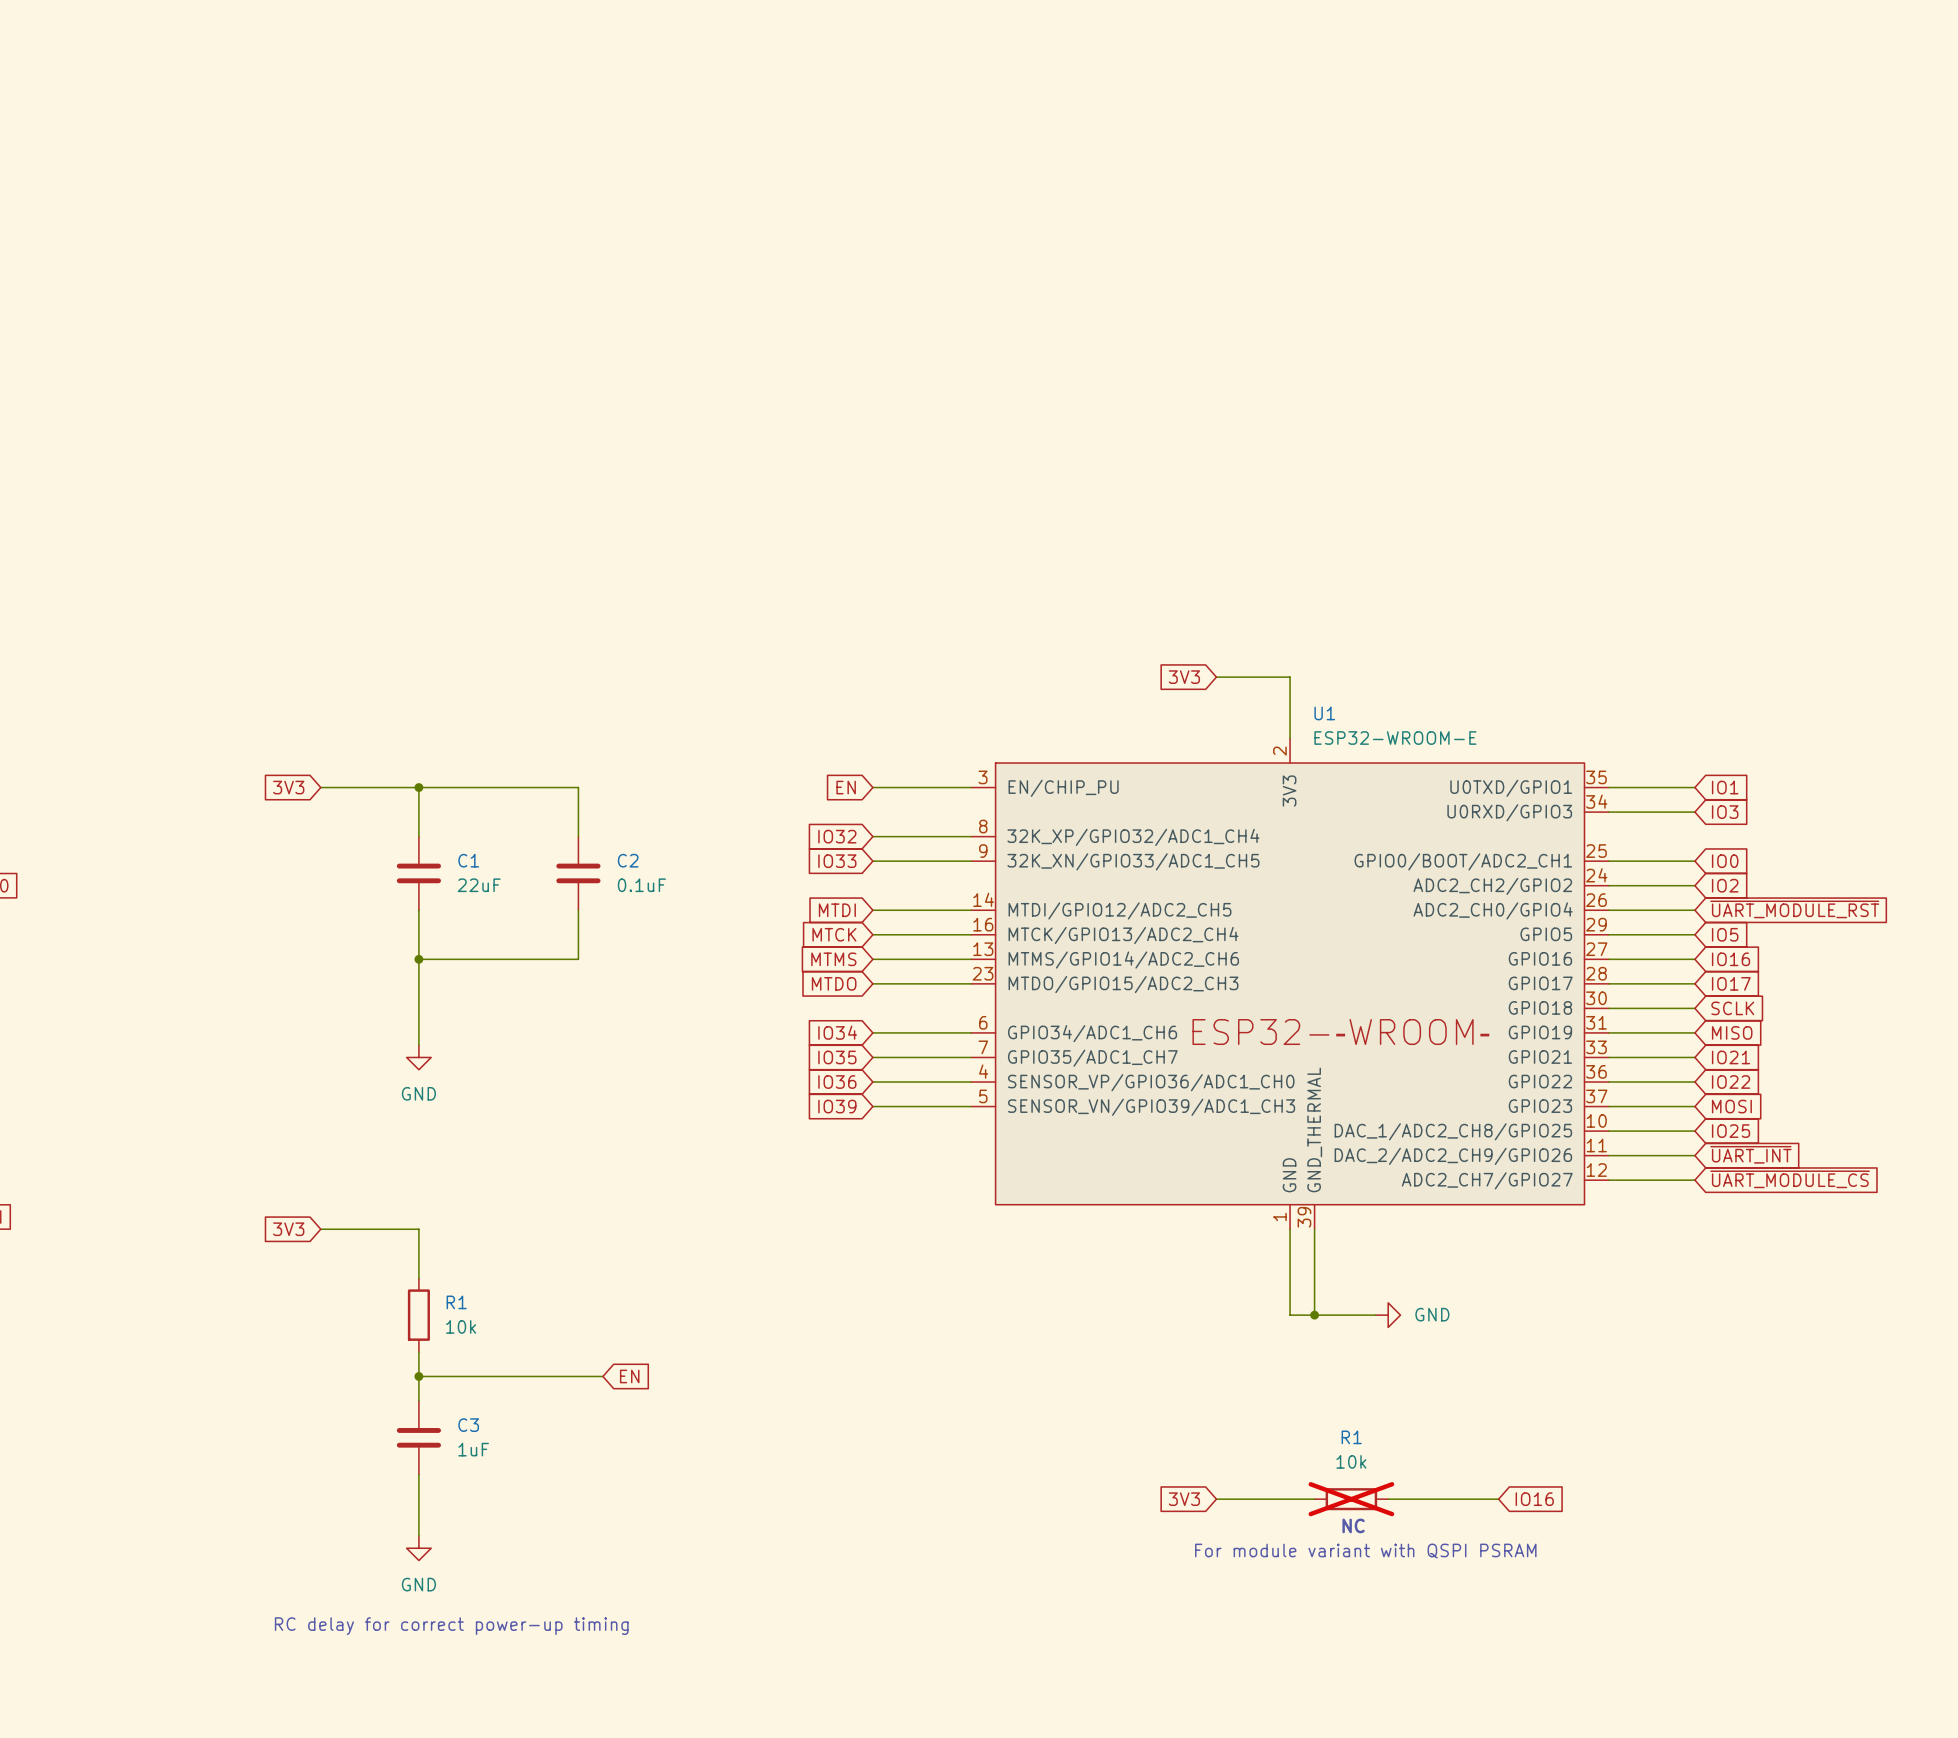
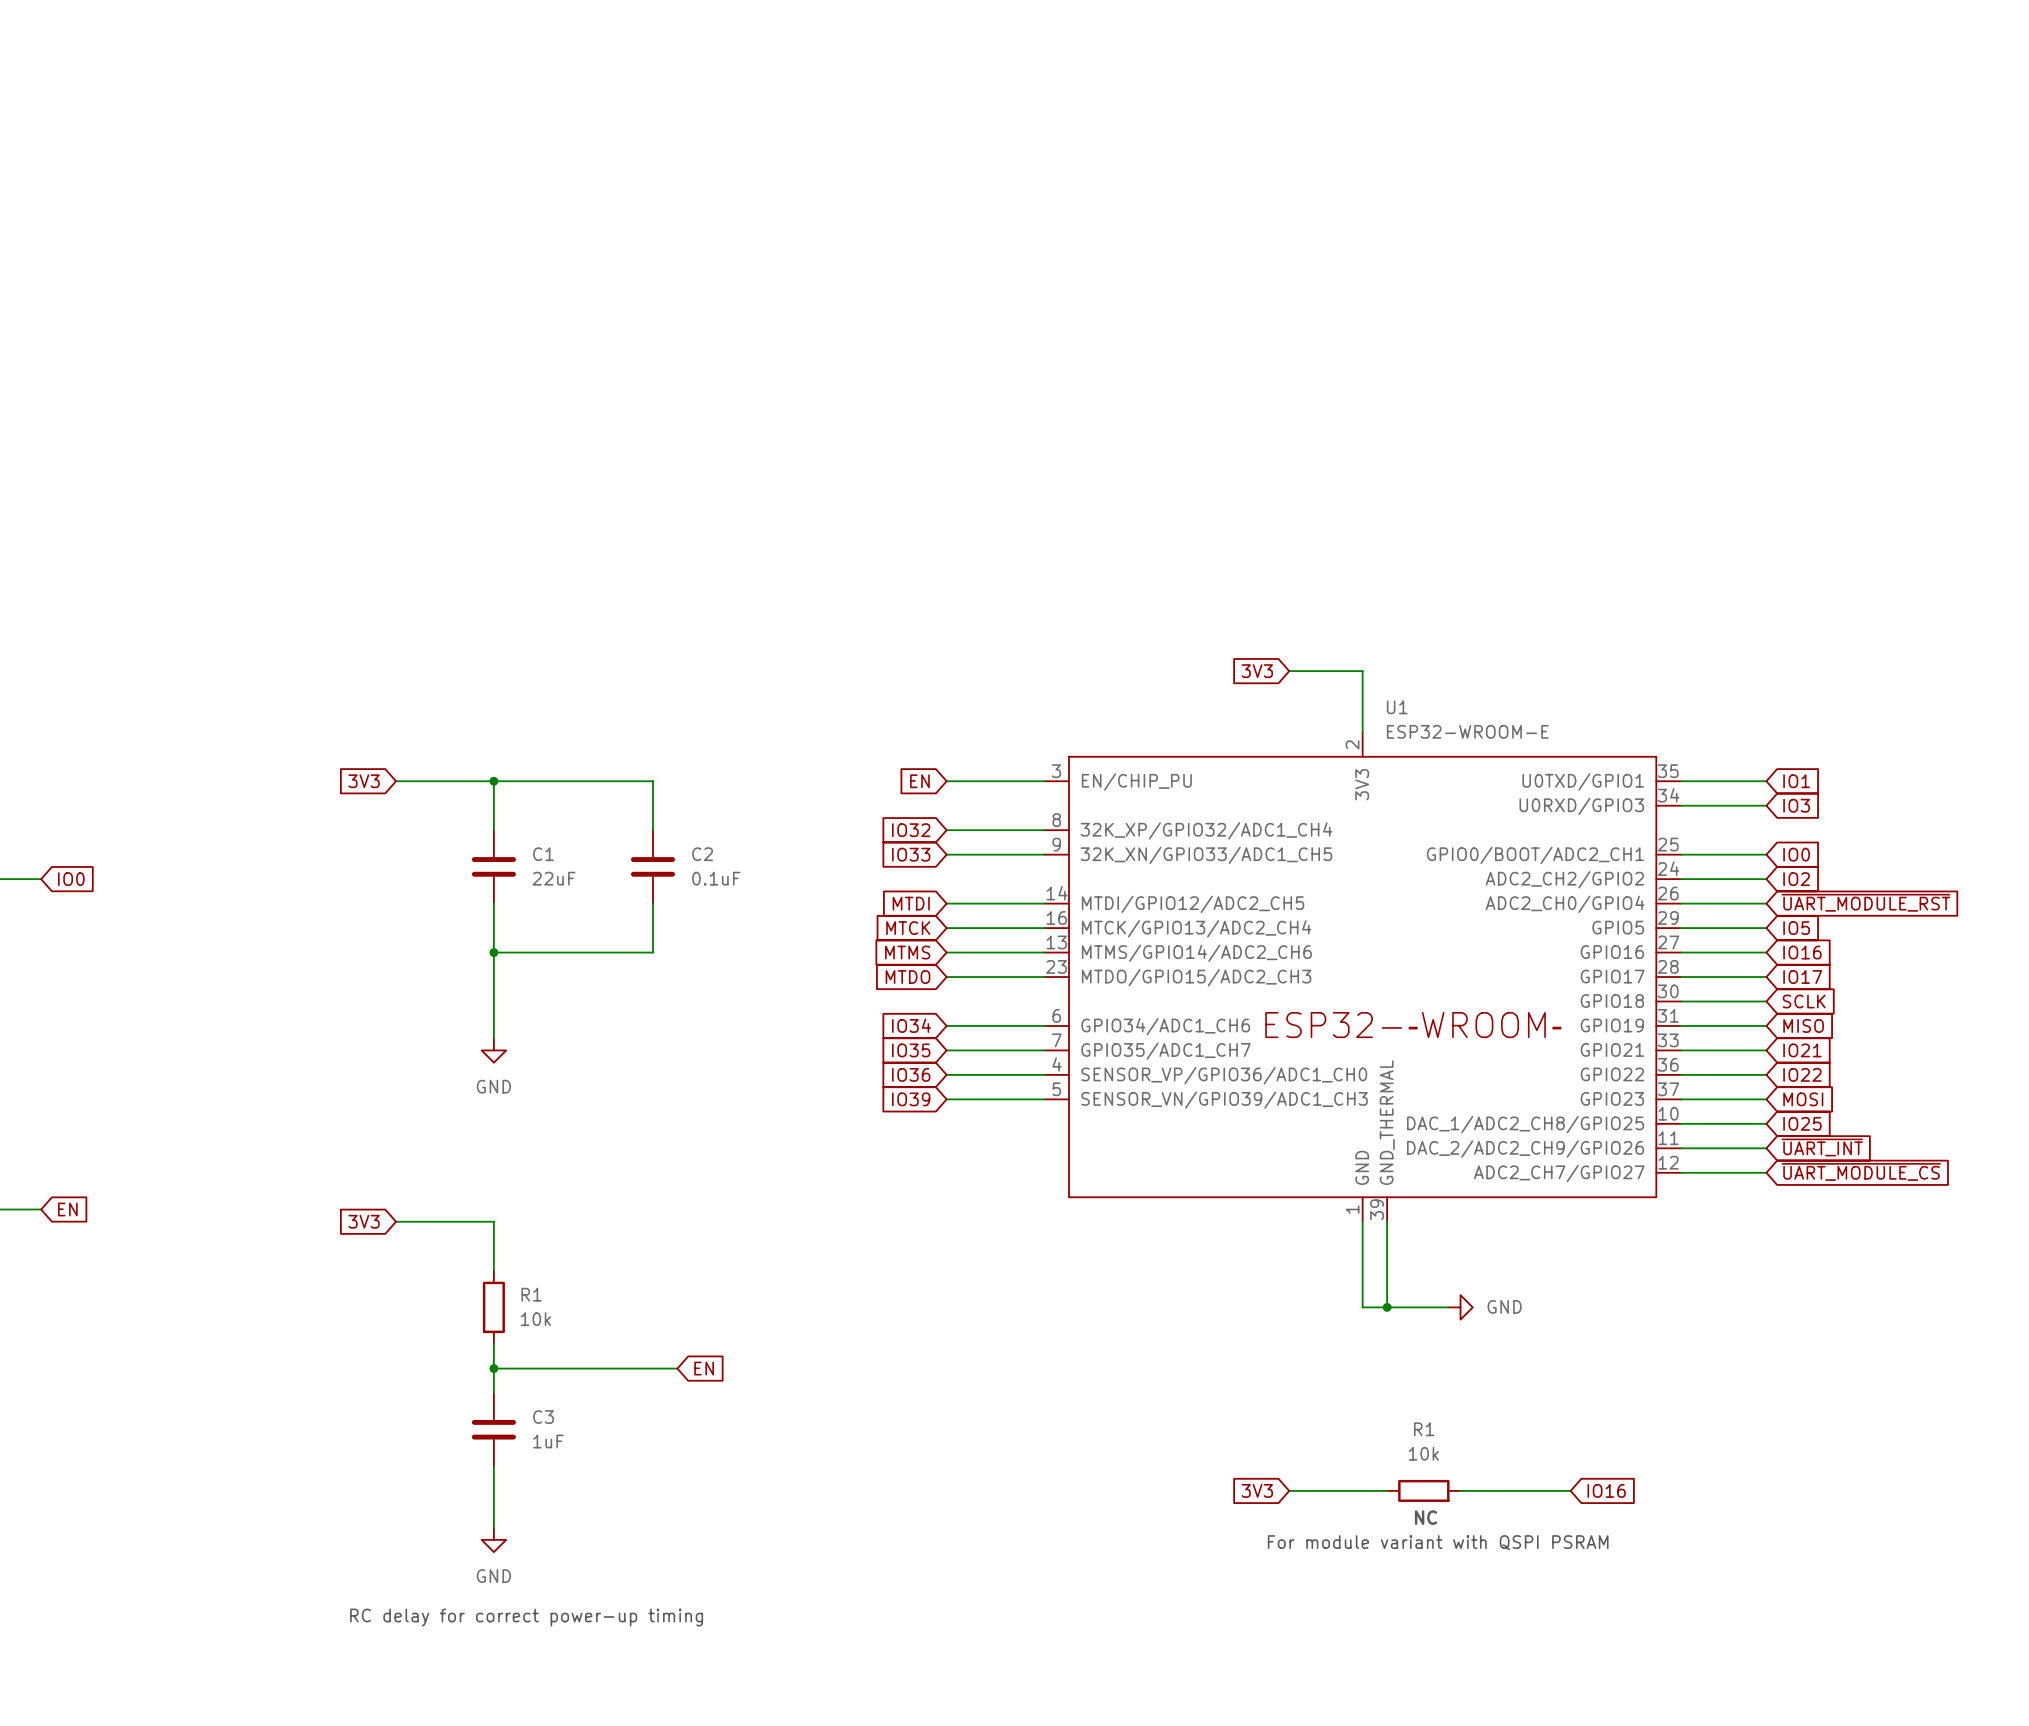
R1 do-not-place cross: (1351, 1499) -> none

